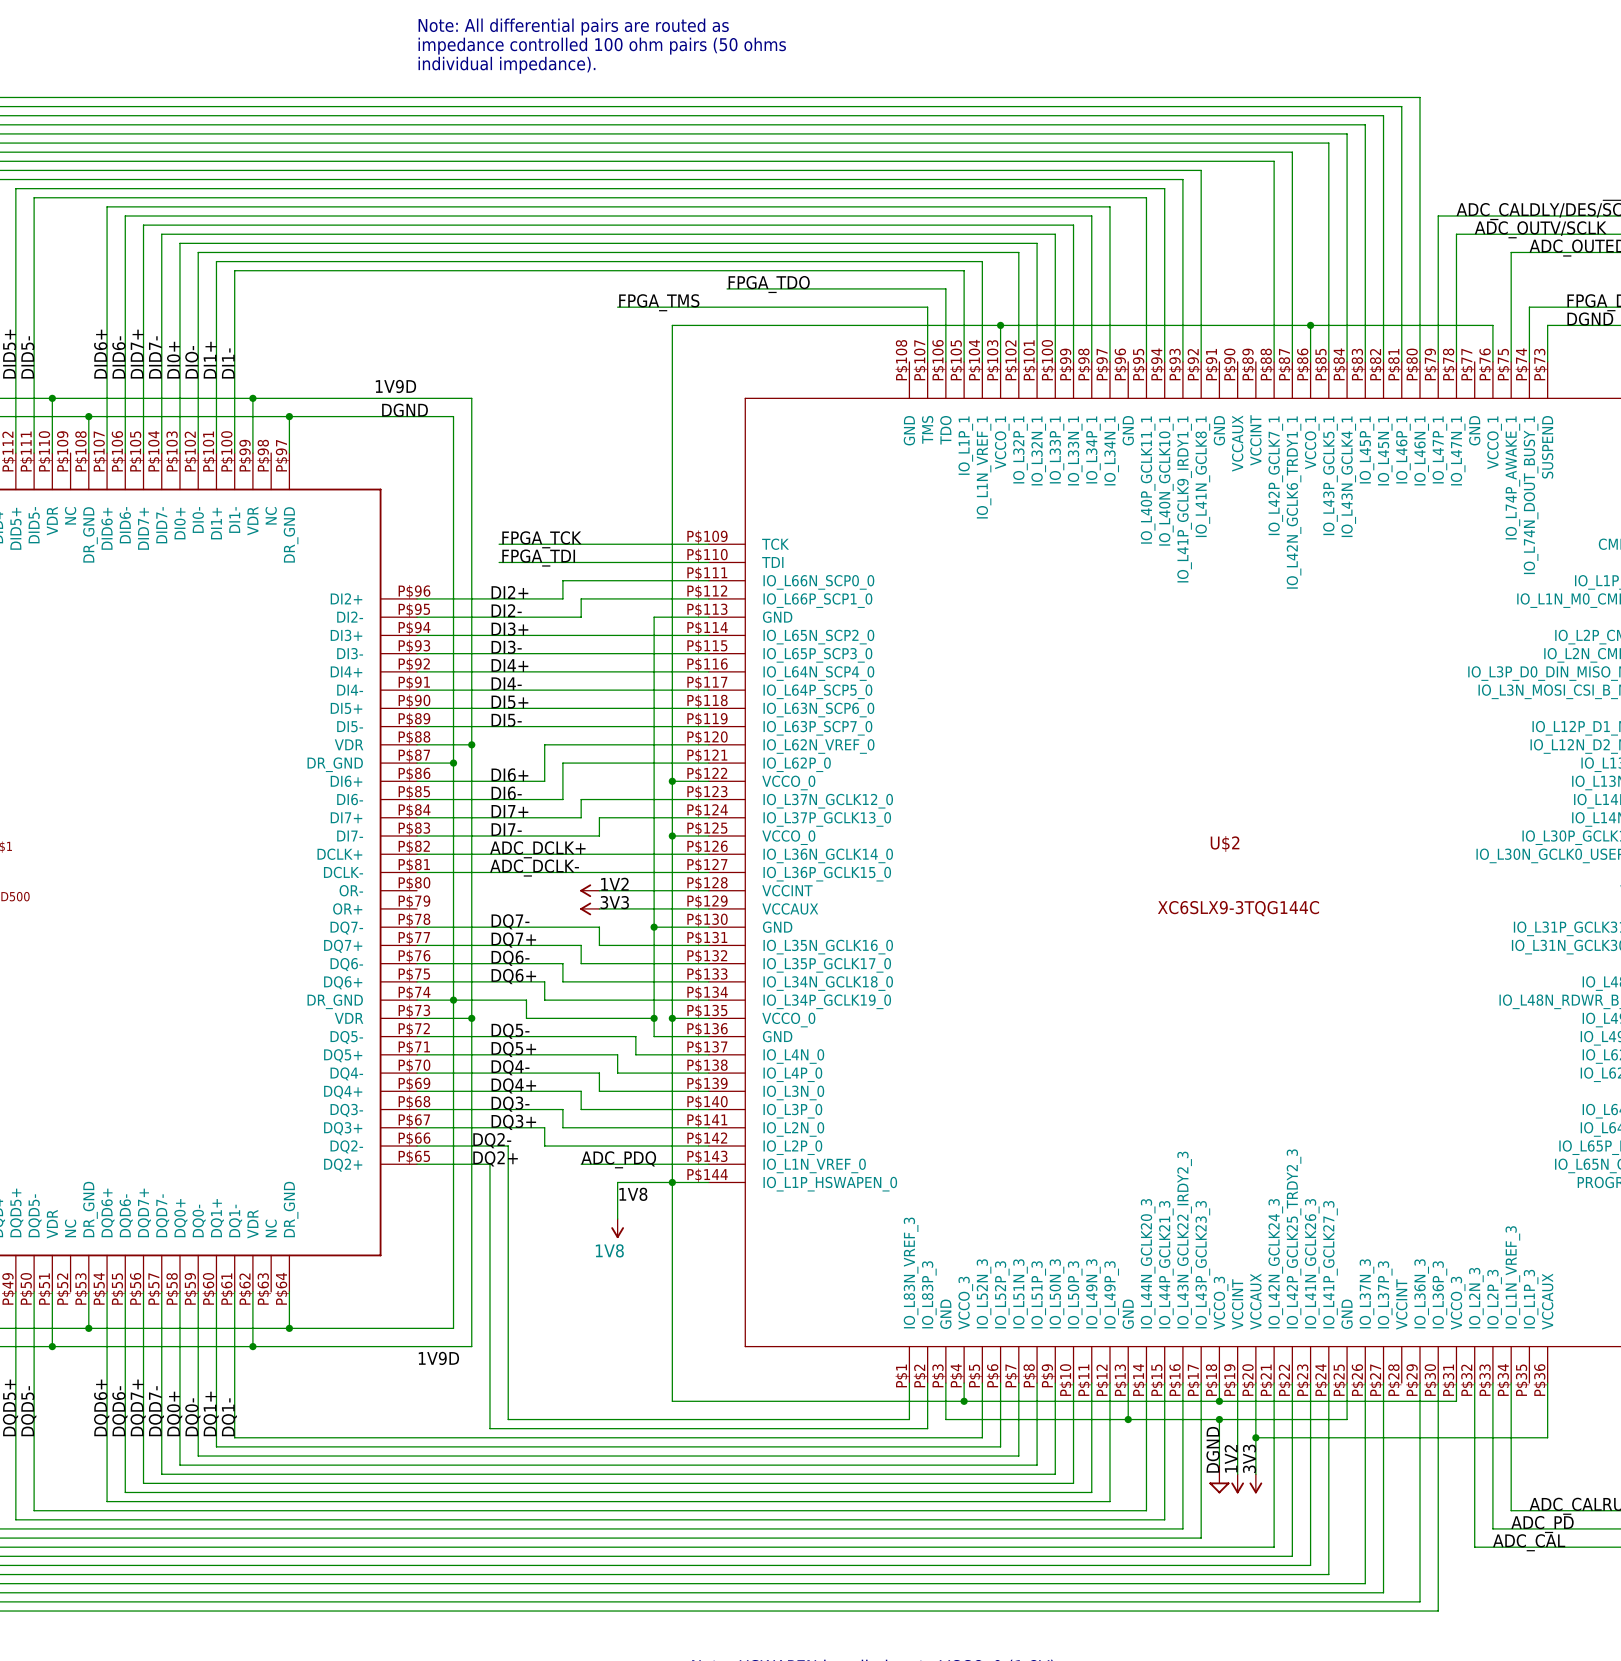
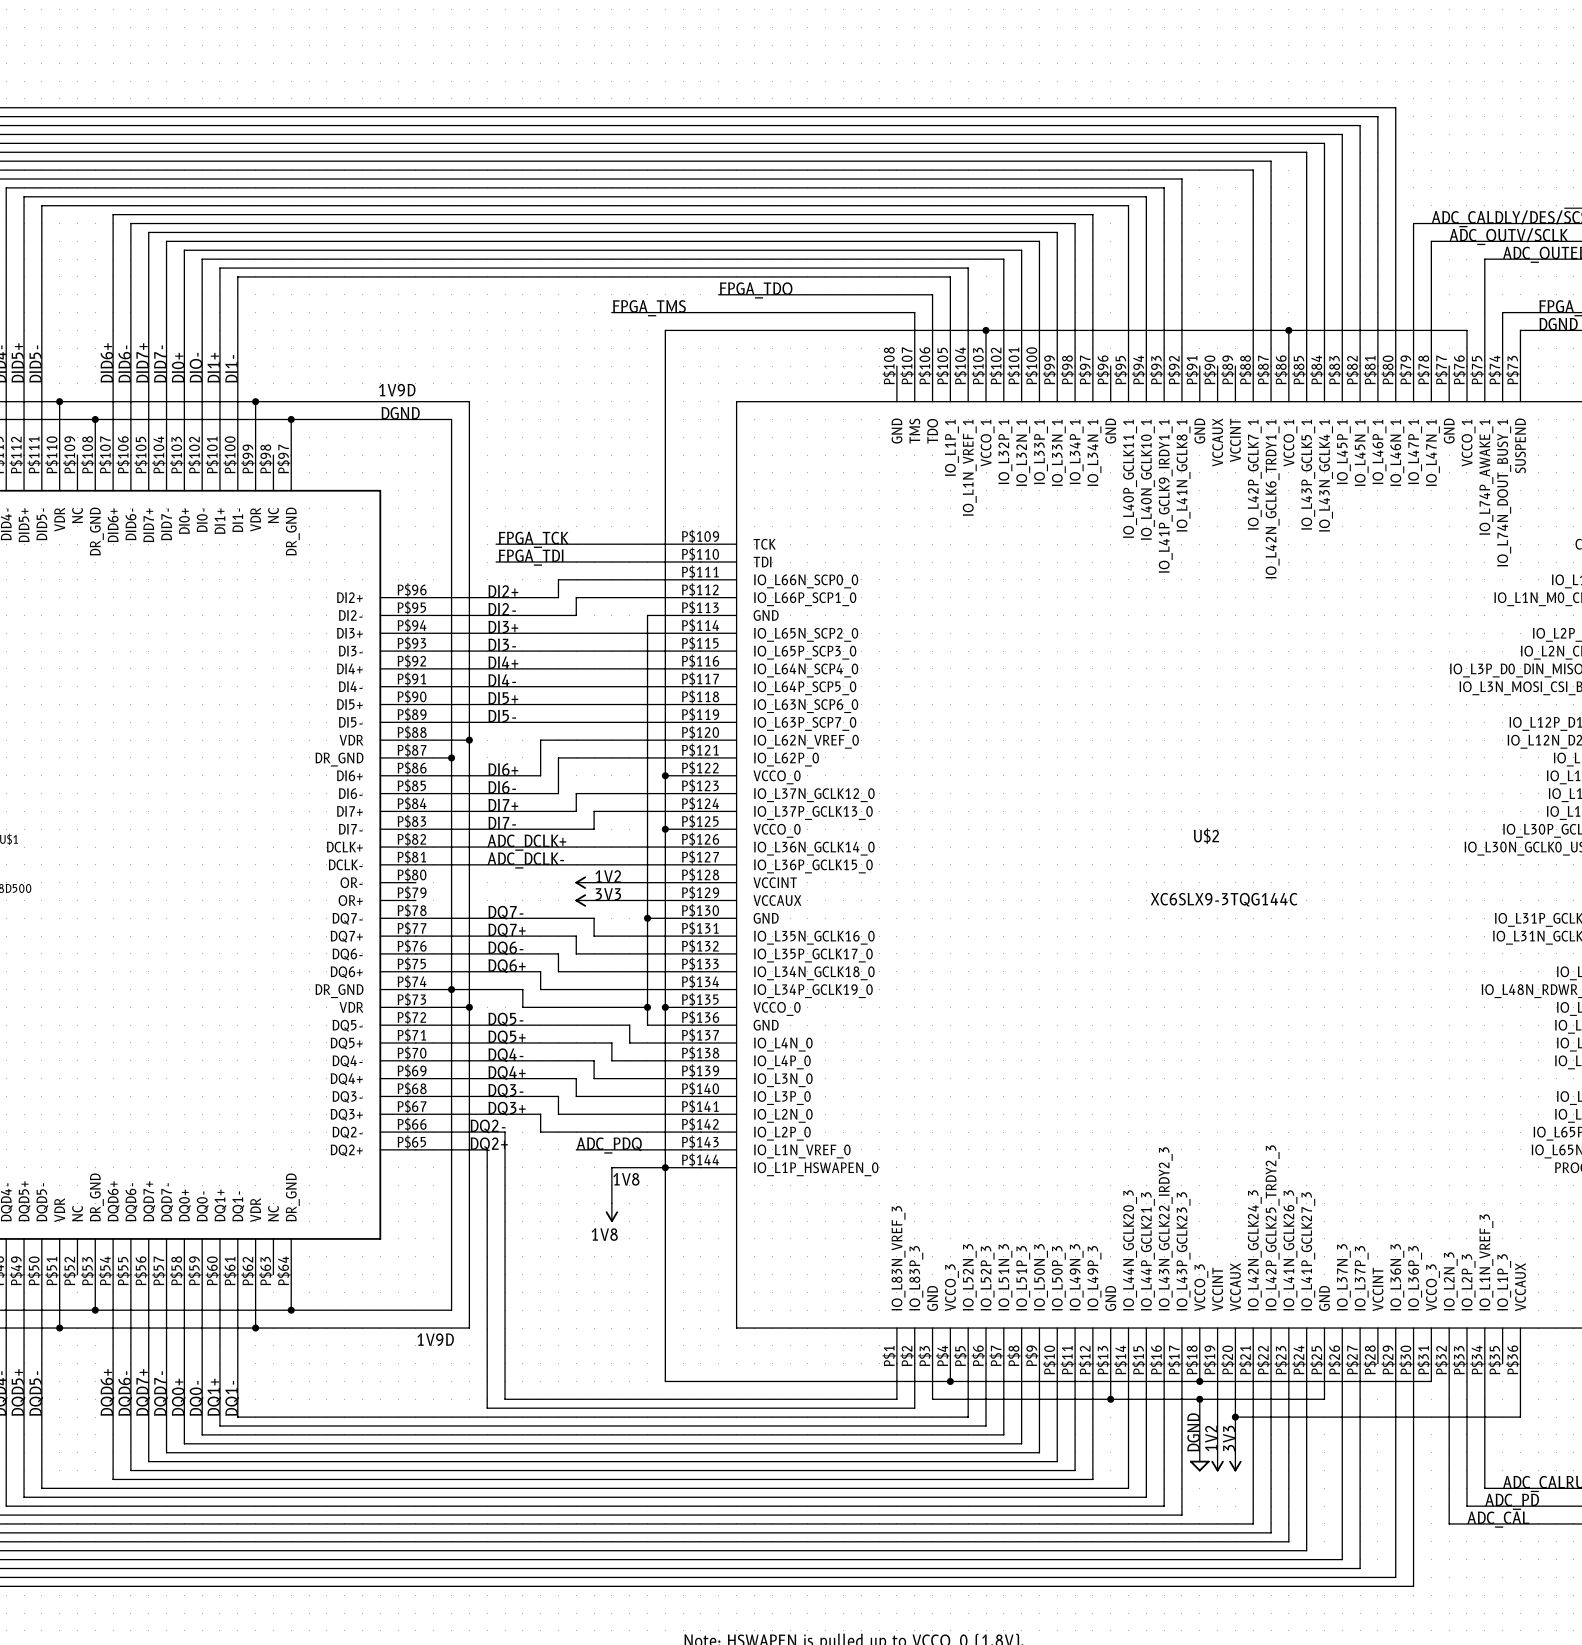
text: Note: All differential pairs are routed as (573, 26) -> none
text: impedance controlled 100 ohm pairs (50 ohms (602, 46) -> none
text: individual impedance). (506, 65) -> none

